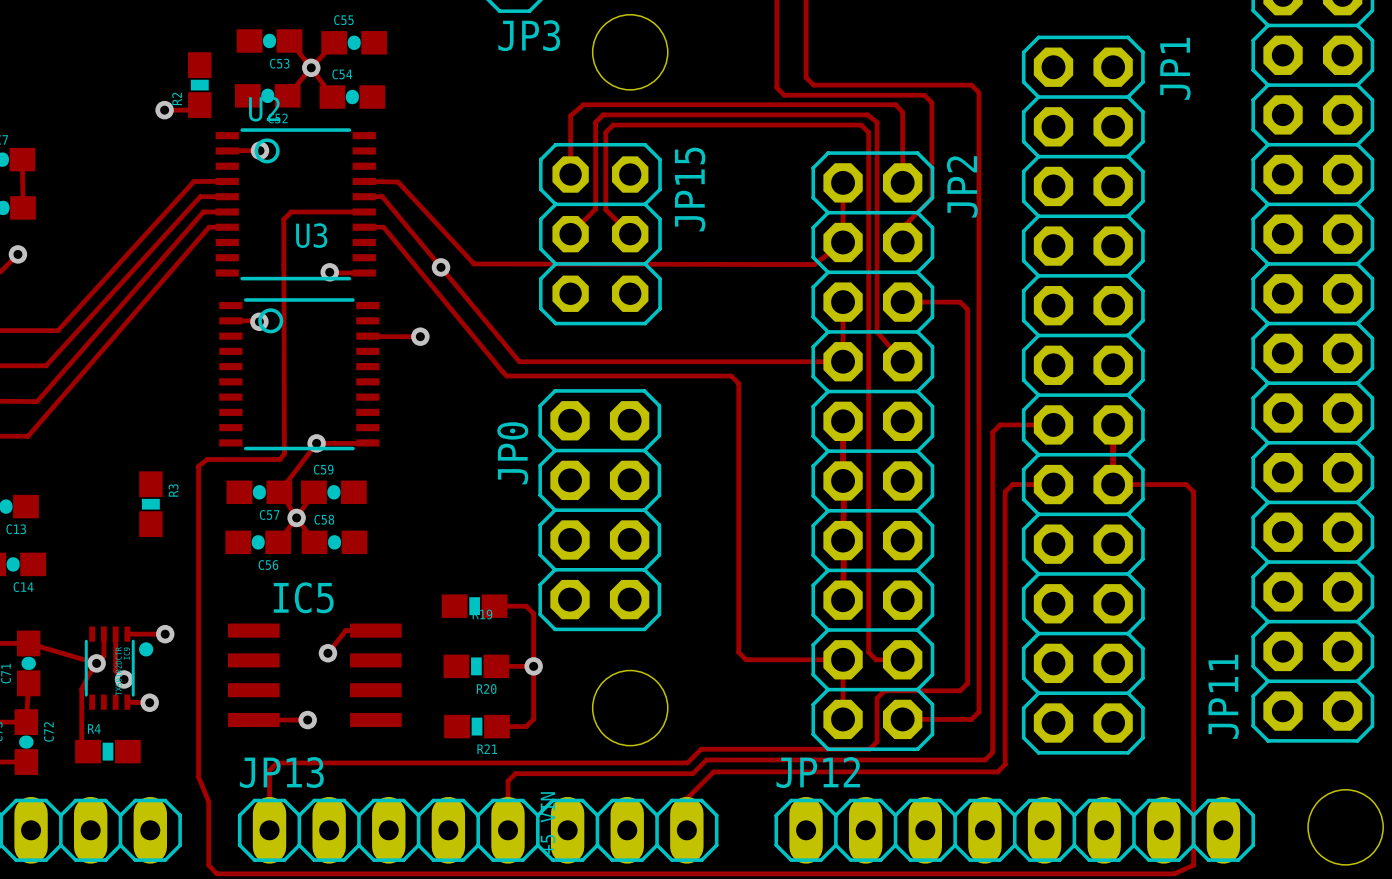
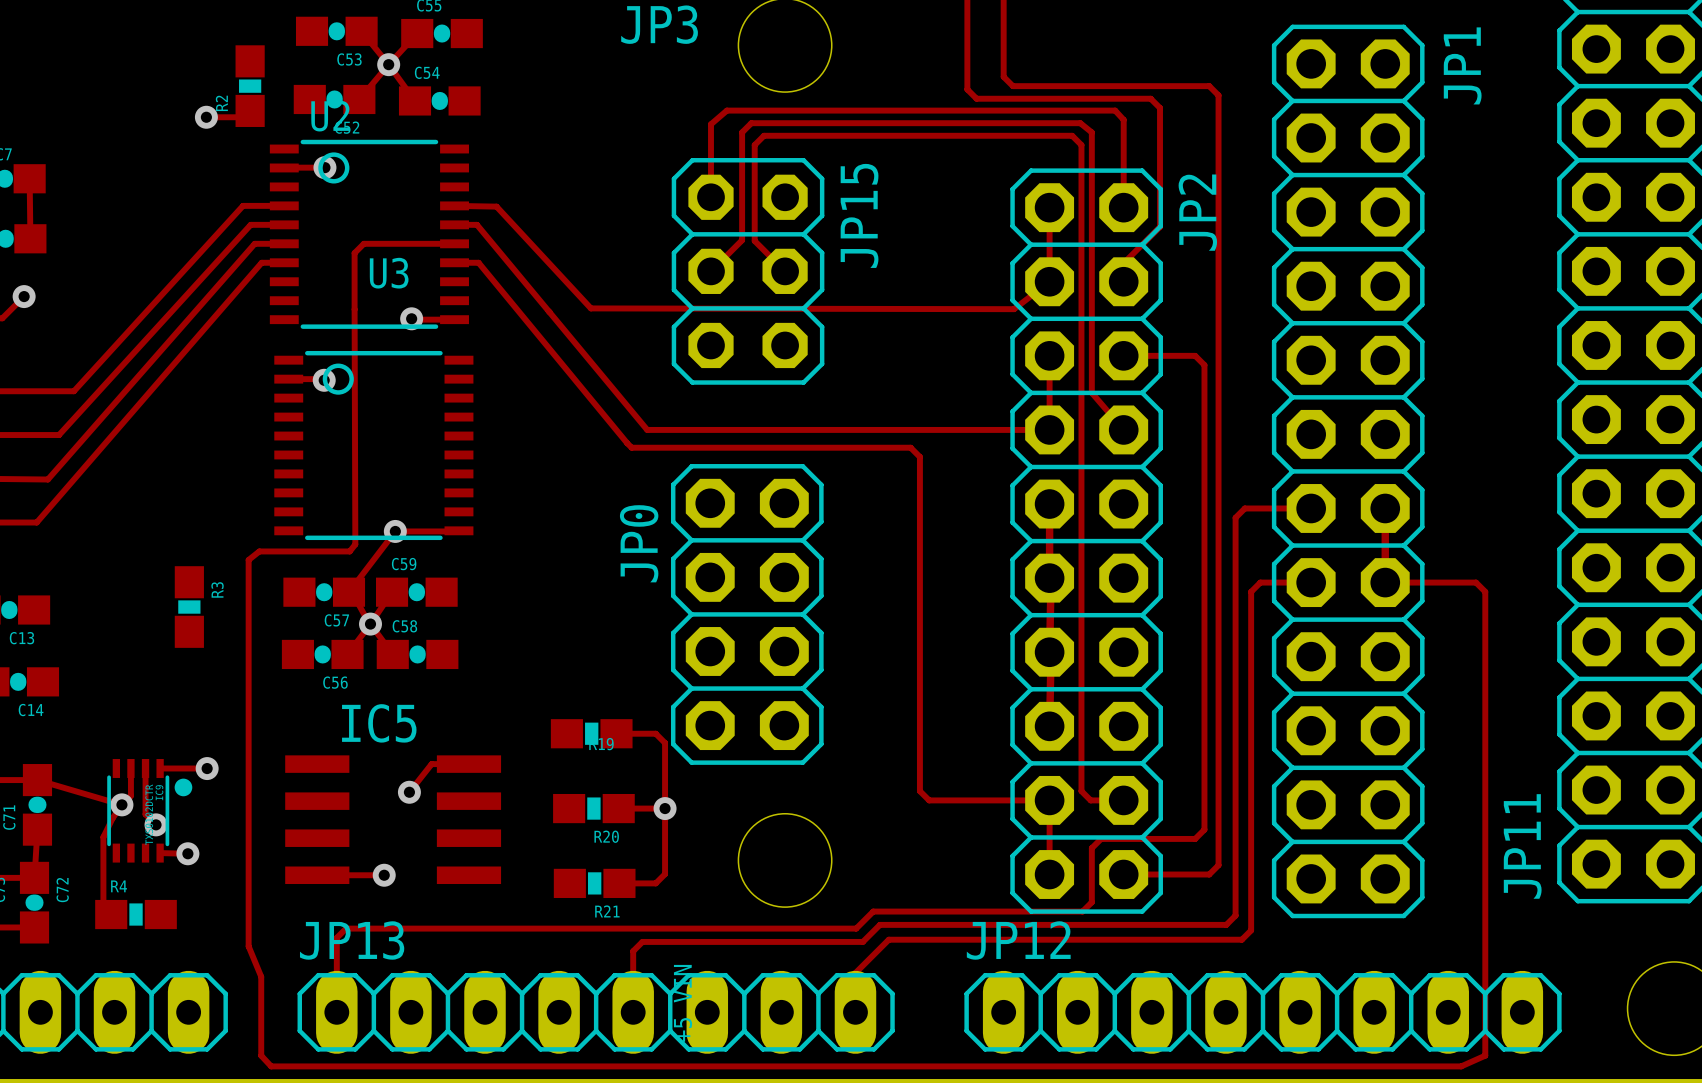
via: (441, 267) -> none
track: (367, 336) (420, 336) -> none
via: (420, 336) -> none

